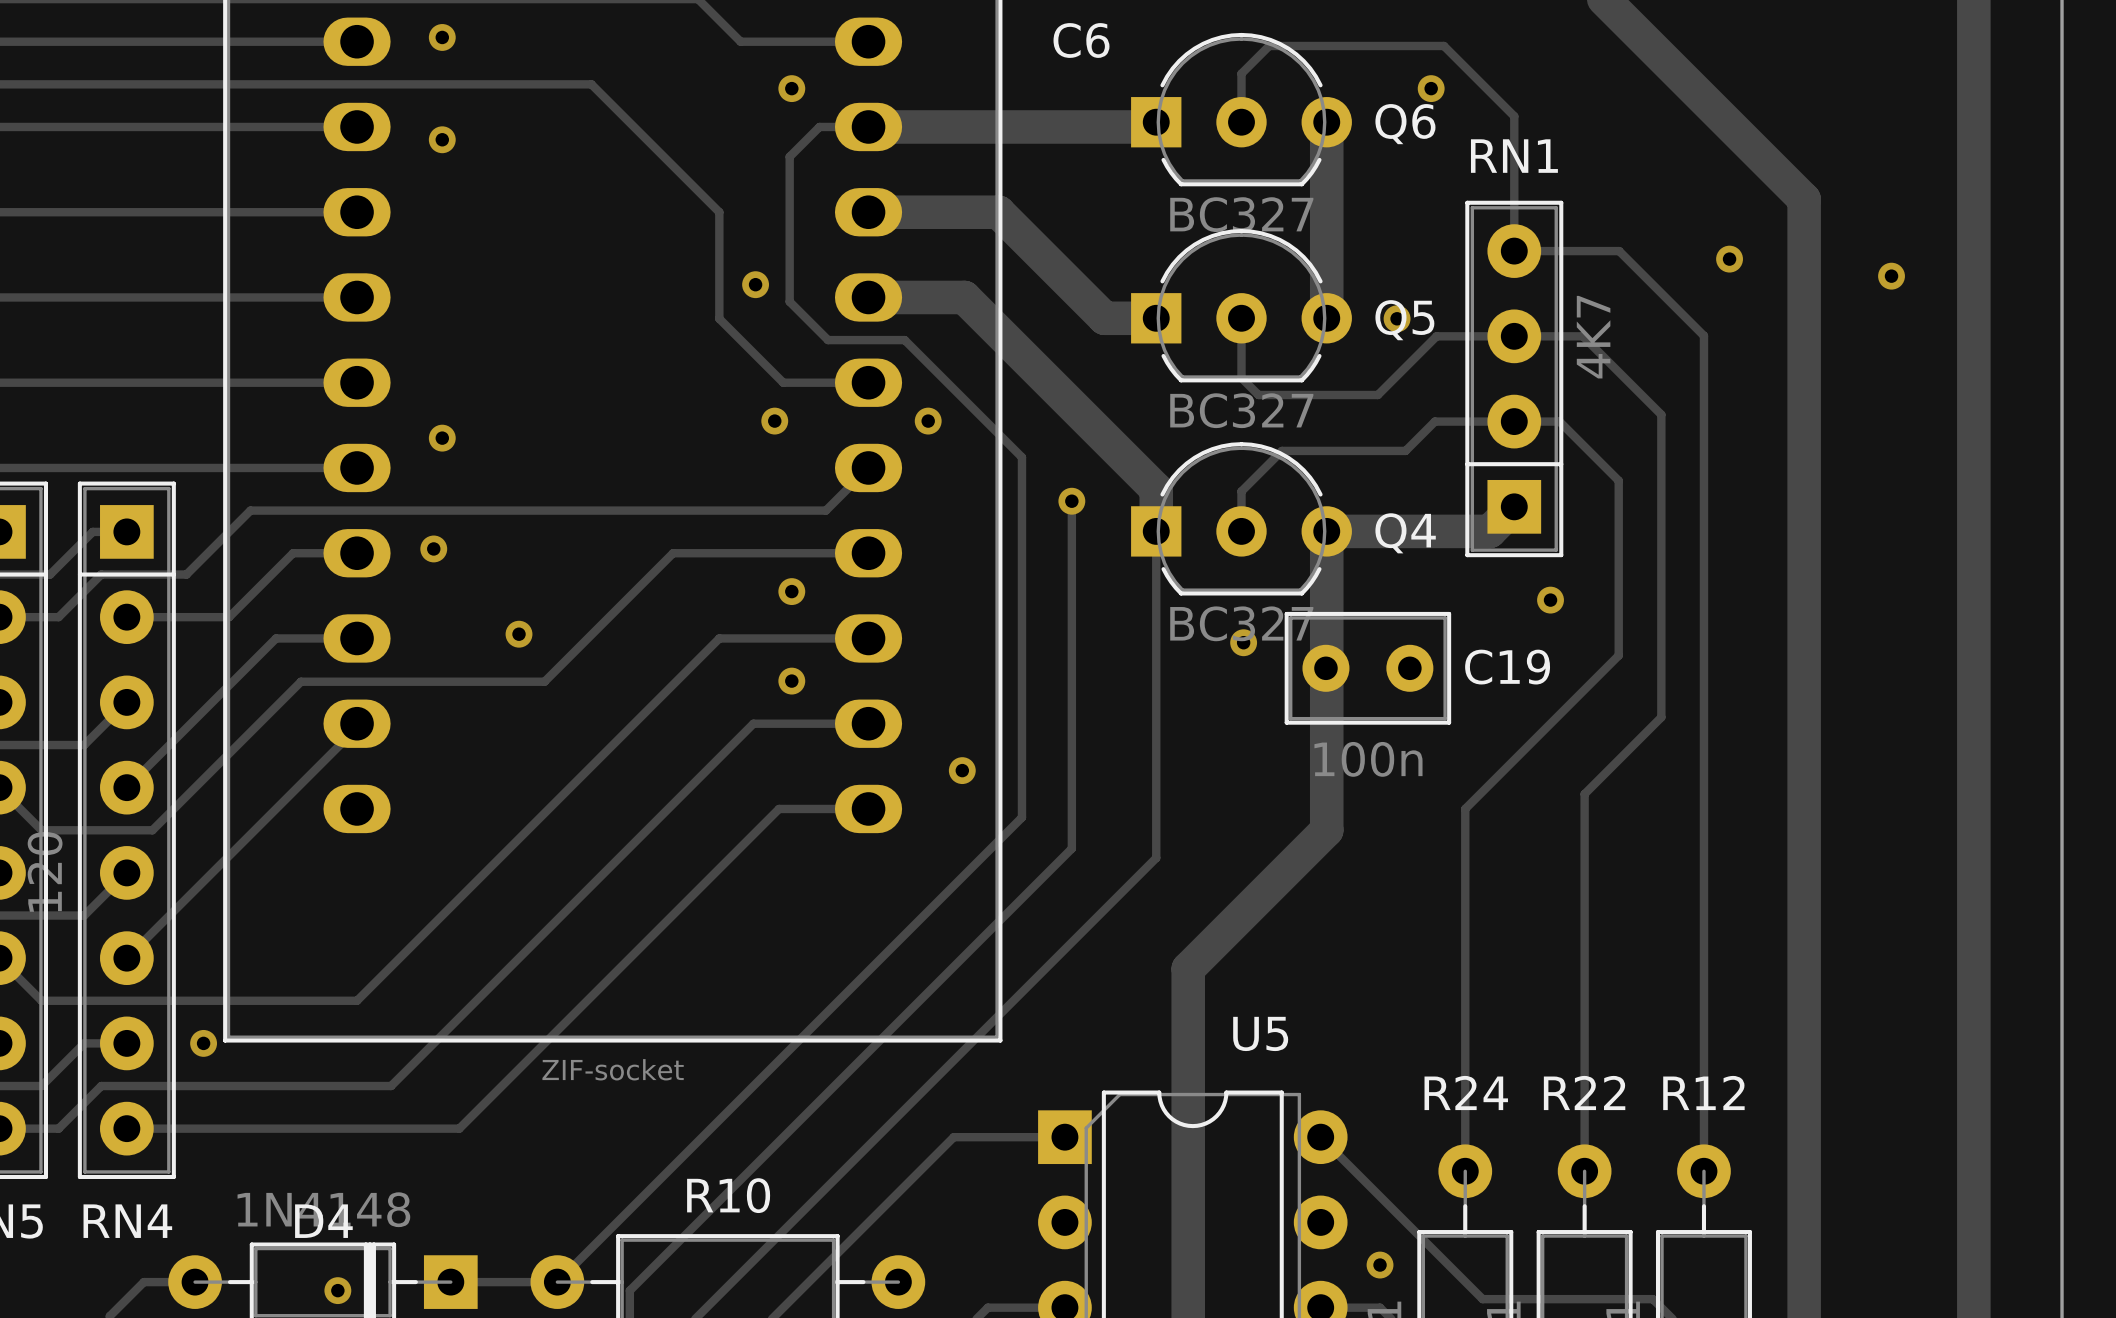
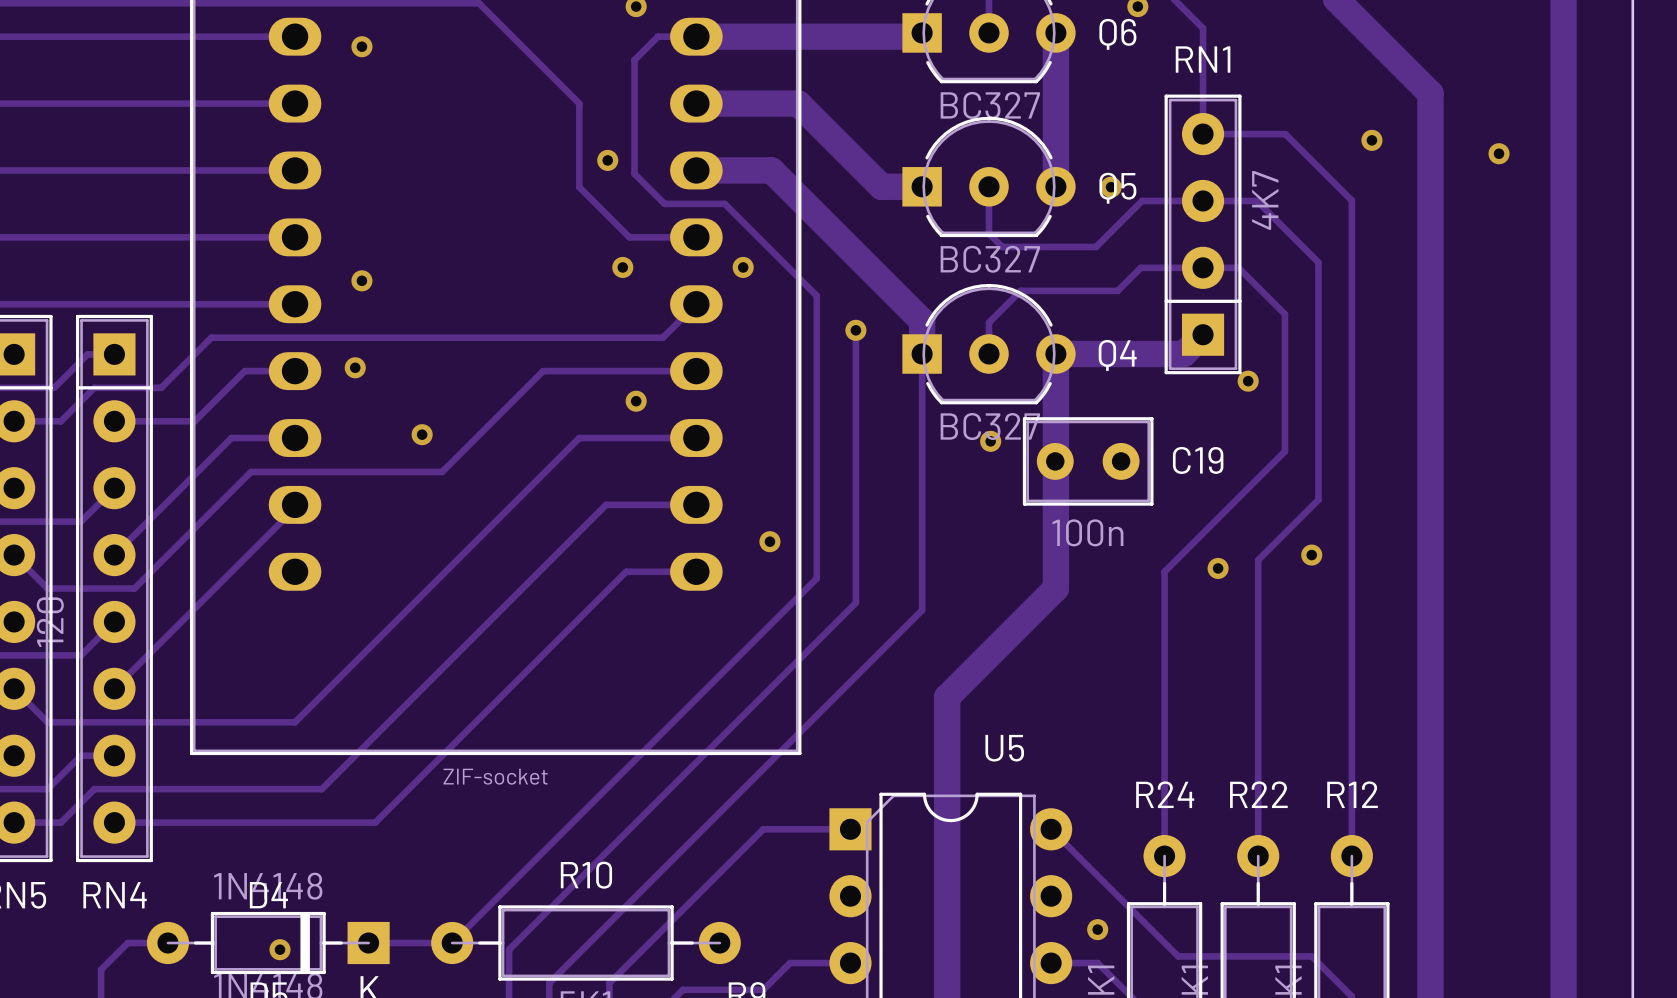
via position: (1550, 600) -> (1248, 381)
via: (791, 681) -> none
via: none -> (1311, 555)
via: none -> (1218, 568)
via: (203, 1043) -> none

